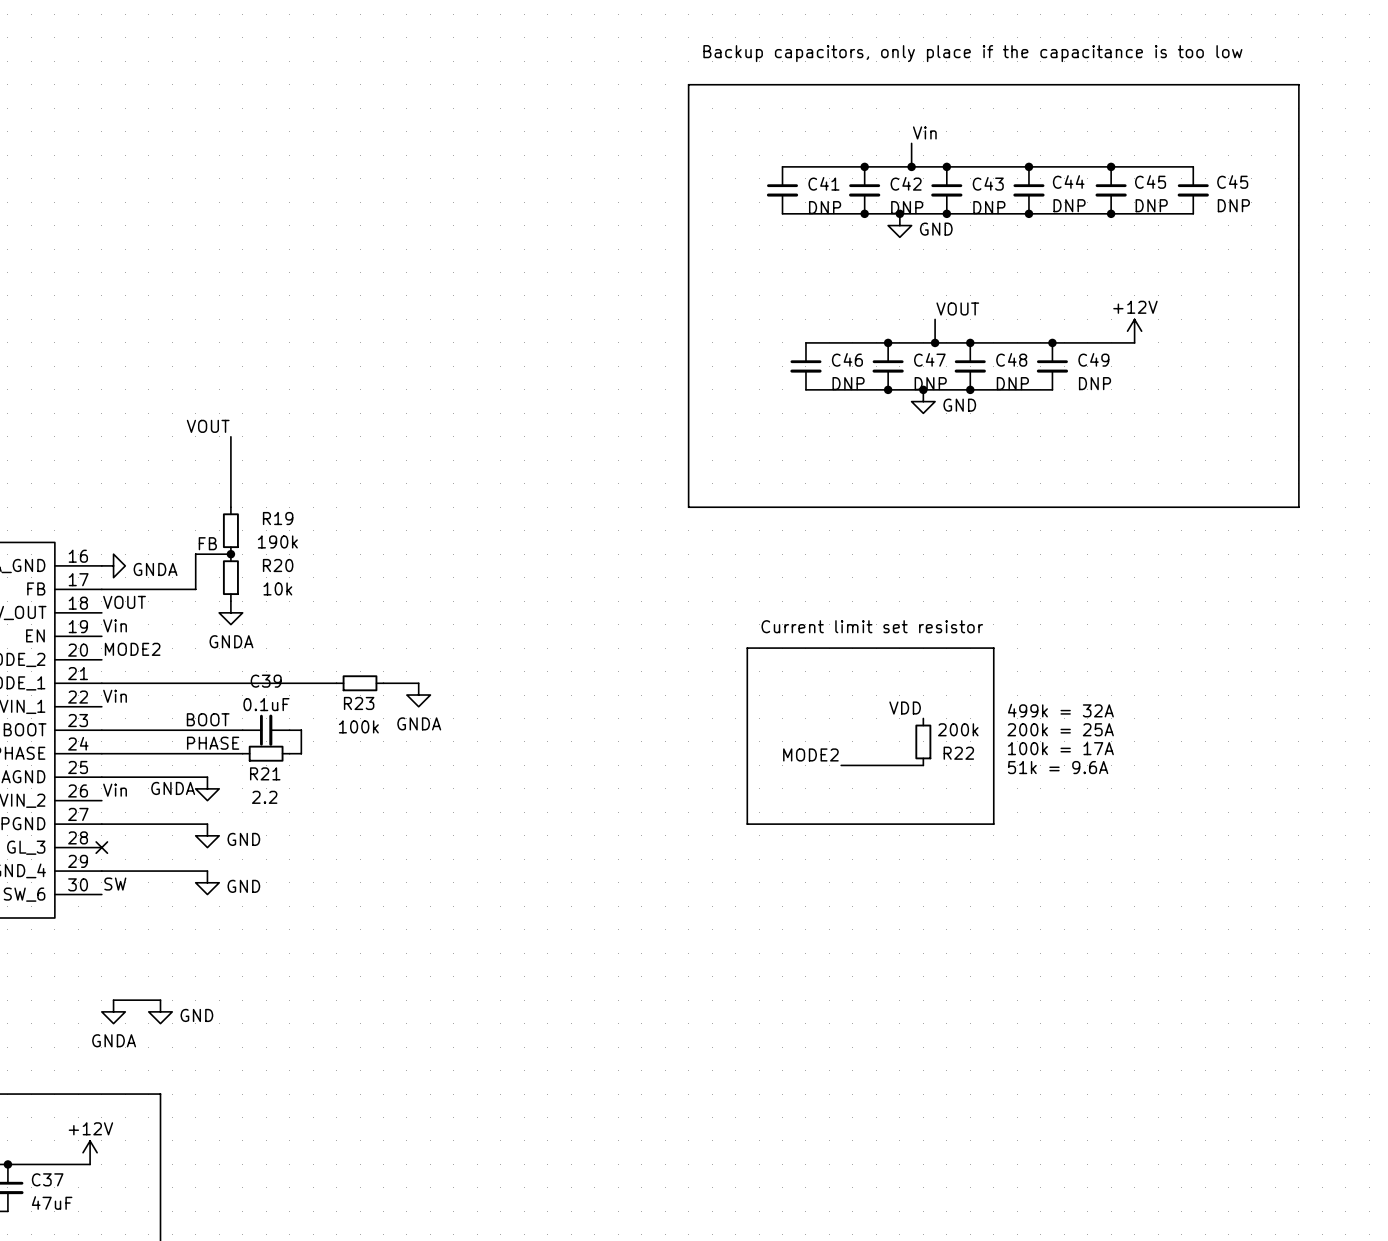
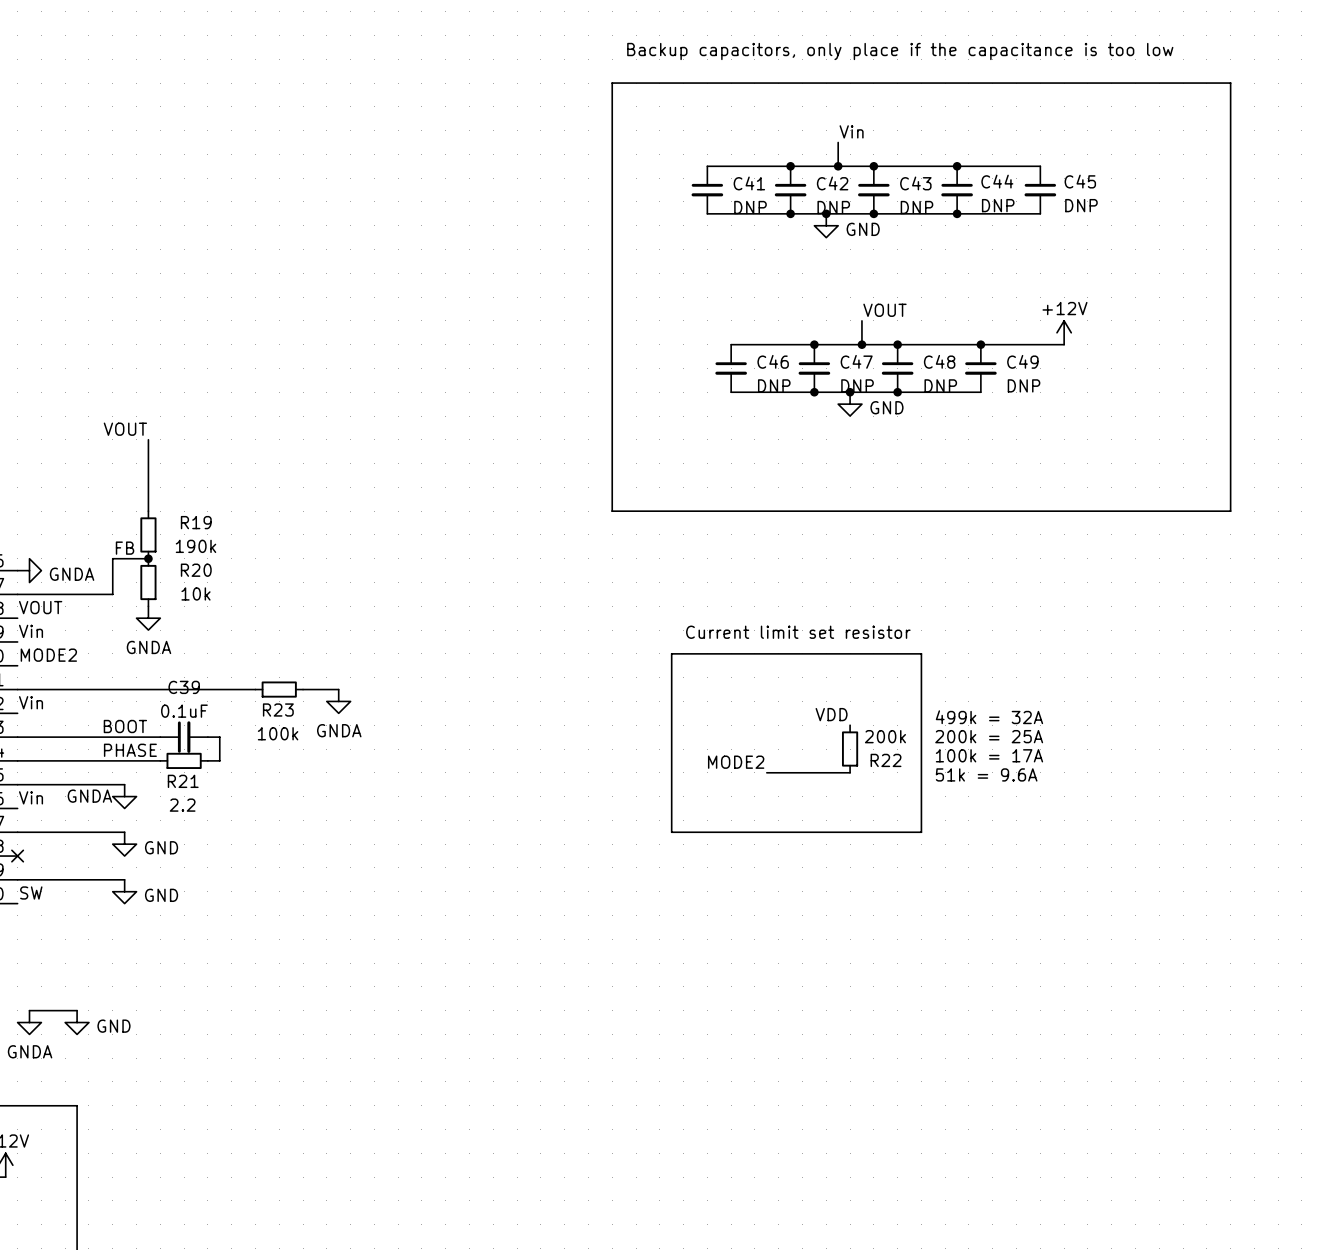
wire: (1111, 166) (1193, 166) -> none
junction: (1111, 166) -> none
C45: DNP (1193, 190) -> none
wire: (1111, 213) (1193, 213) -> none
junction: (1111, 213) -> none

